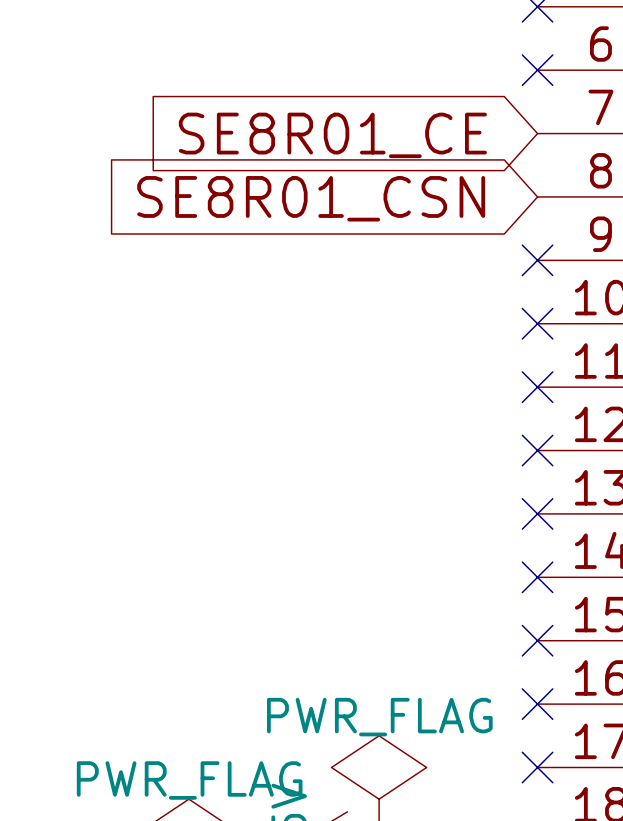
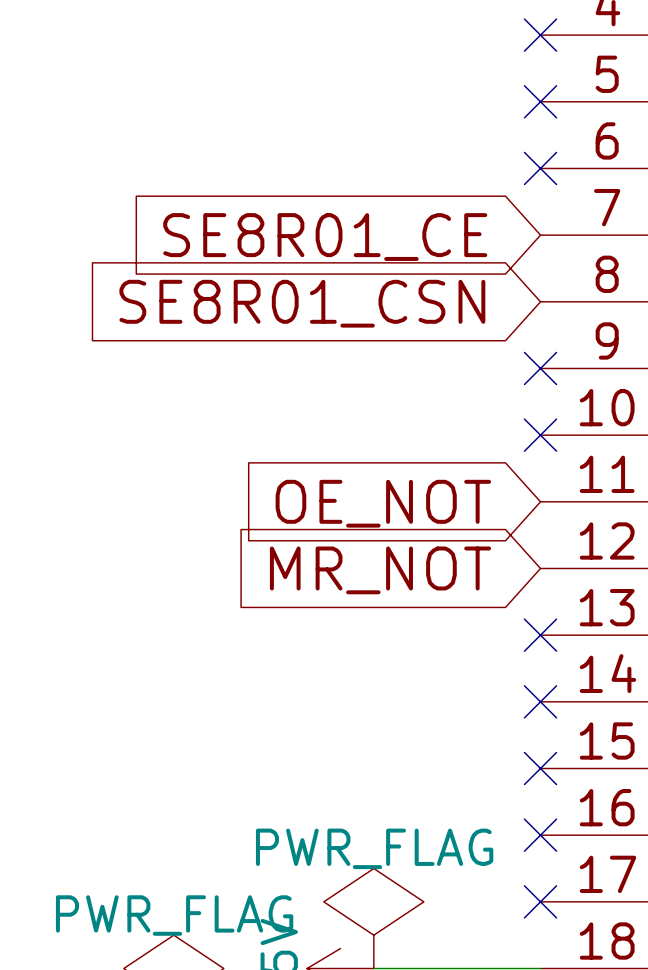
no-connect mark: (537, 387) -> none
global label: none -> OE_NOT (383, 503)
no-connect mark: (537, 450) -> none
global label: none -> MR_NOT (380, 570)

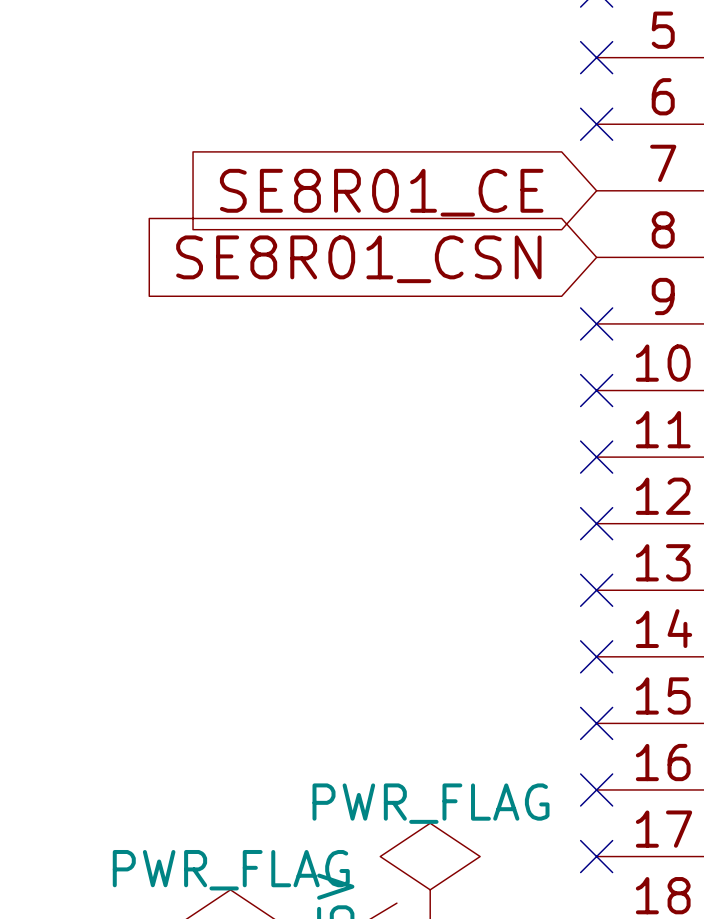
no-connect mark: none -> (596, 457)
global label: OE_NOT (383, 503) -> none
no-connect mark: none -> (596, 523)
global label: MR_NOT (380, 570) -> none

